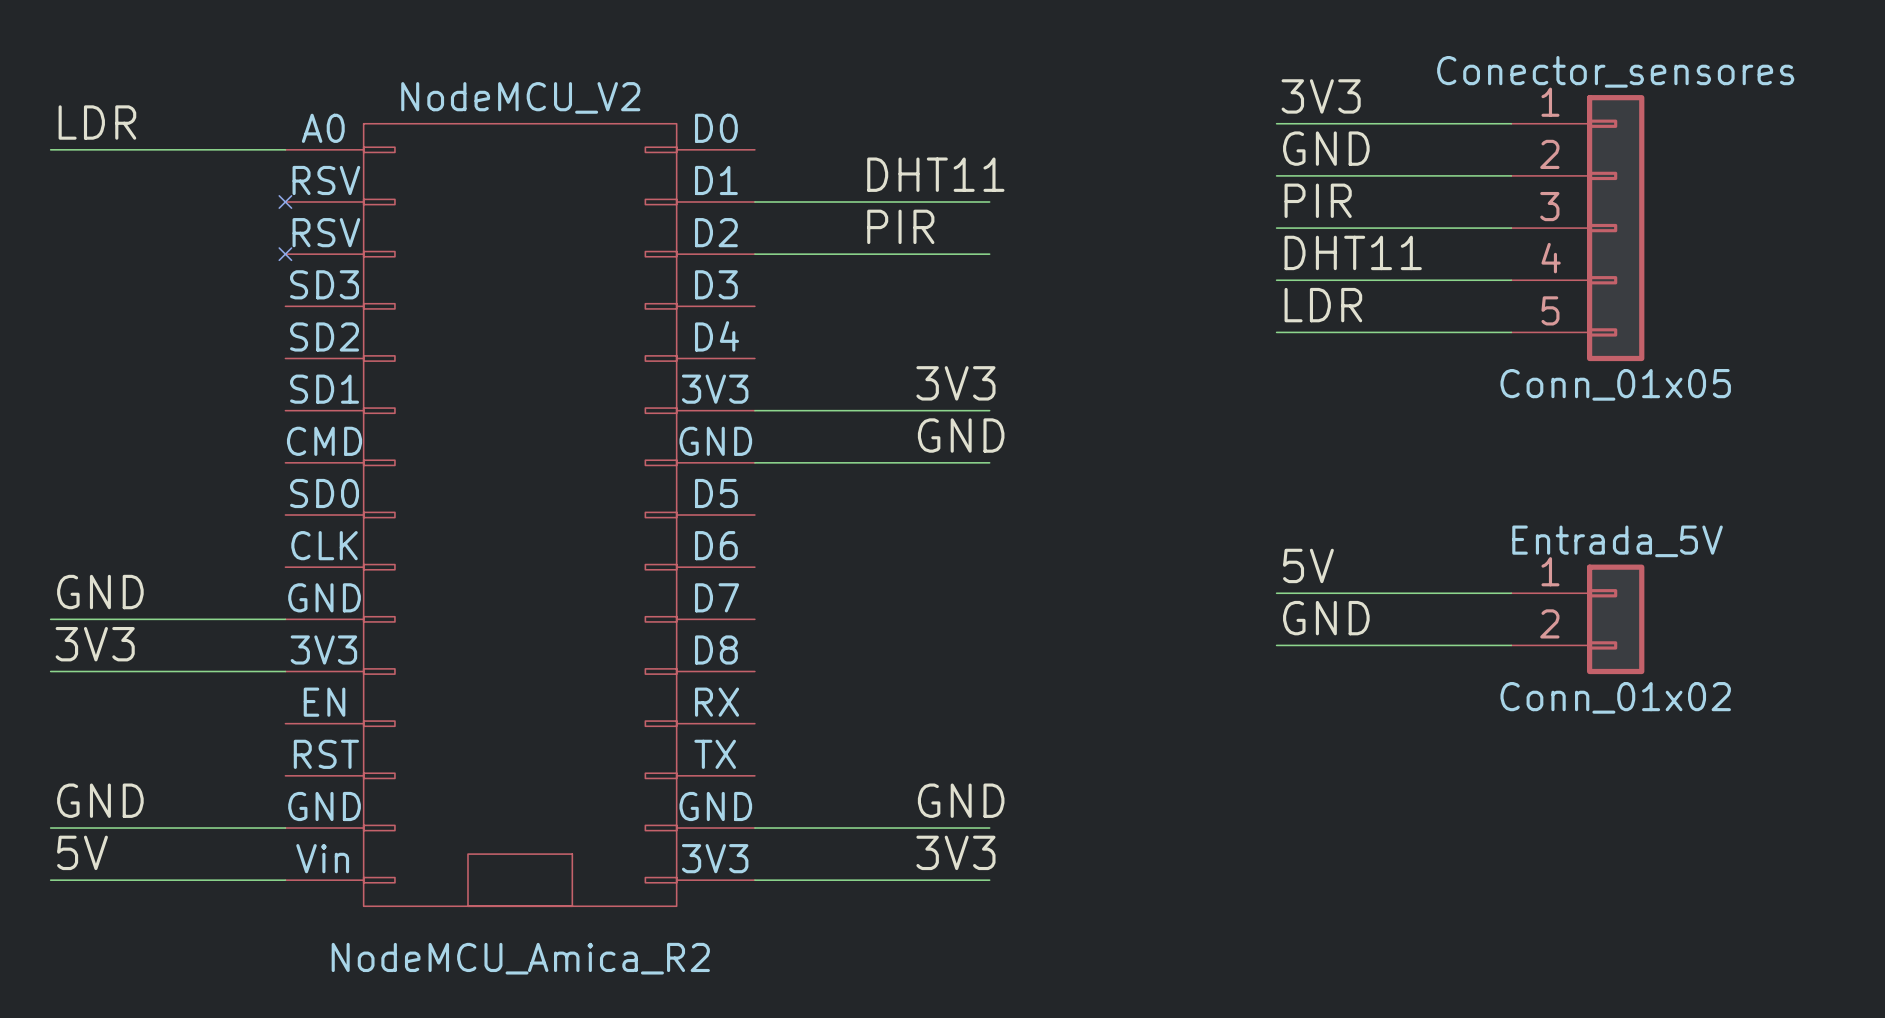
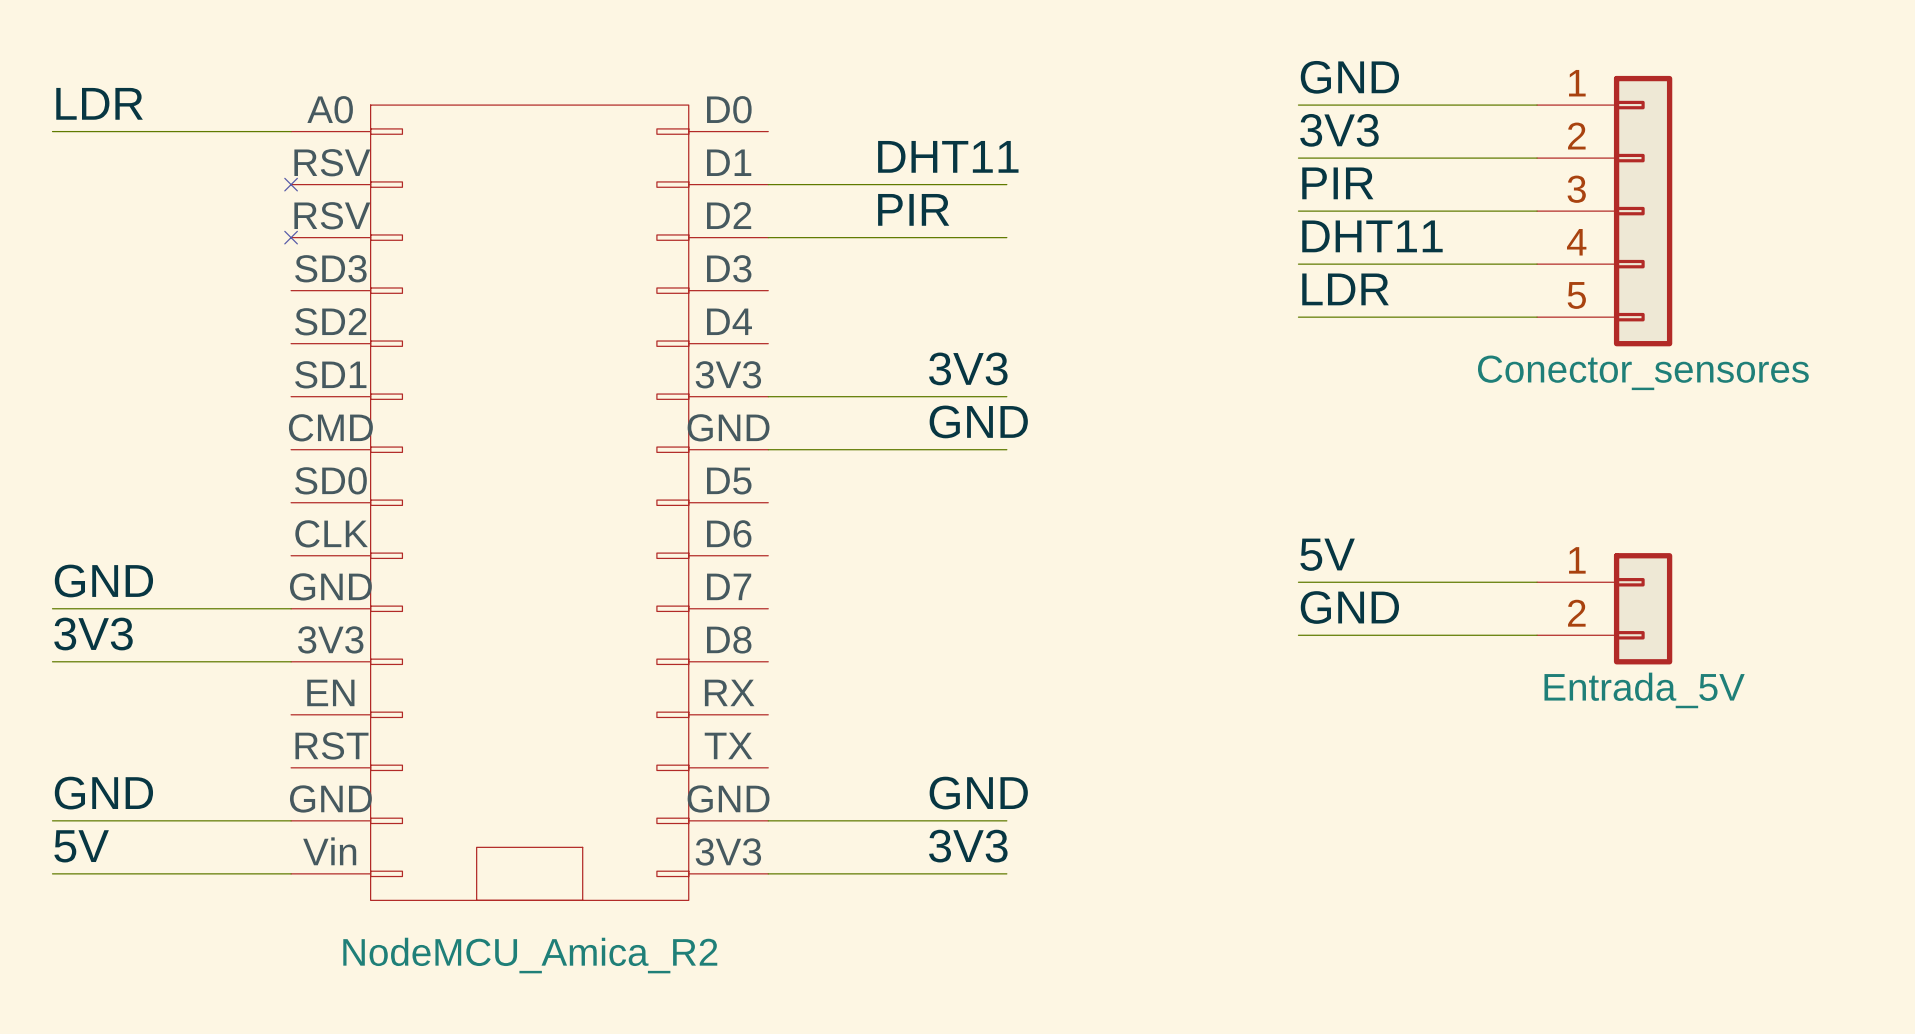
Conector_sensores name: Conector_sensores (1615, 71) -> none
label: 3V3 (1321, 96) -> GND (1349, 77)
NodeMCU_V2 name: NodeMCU_V2 (520, 97) -> none
label: GND (1326, 148) -> 3V3 (1339, 130)
Conector_sensores value: Conn_01x05 (1615, 384) -> Conector_sensores (1643, 372)
Entrada_5V name: Entrada_5V (1617, 541) -> none
Entrada_5V value: Conn_01x02 (1615, 697) -> Entrada_5V (1644, 690)

